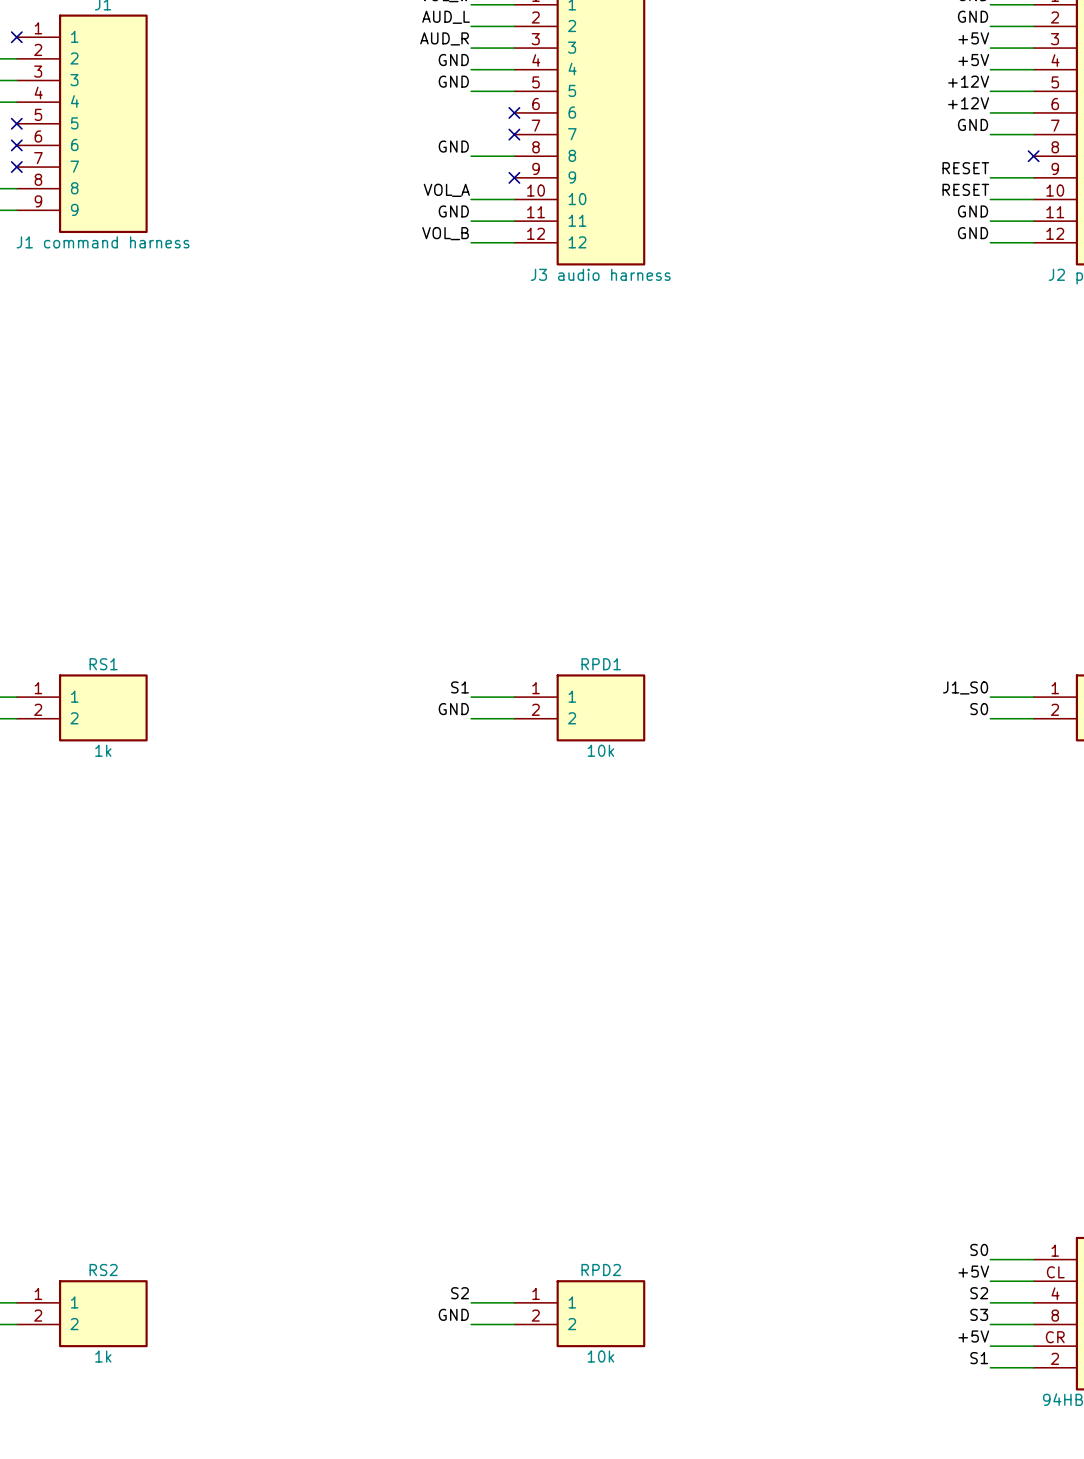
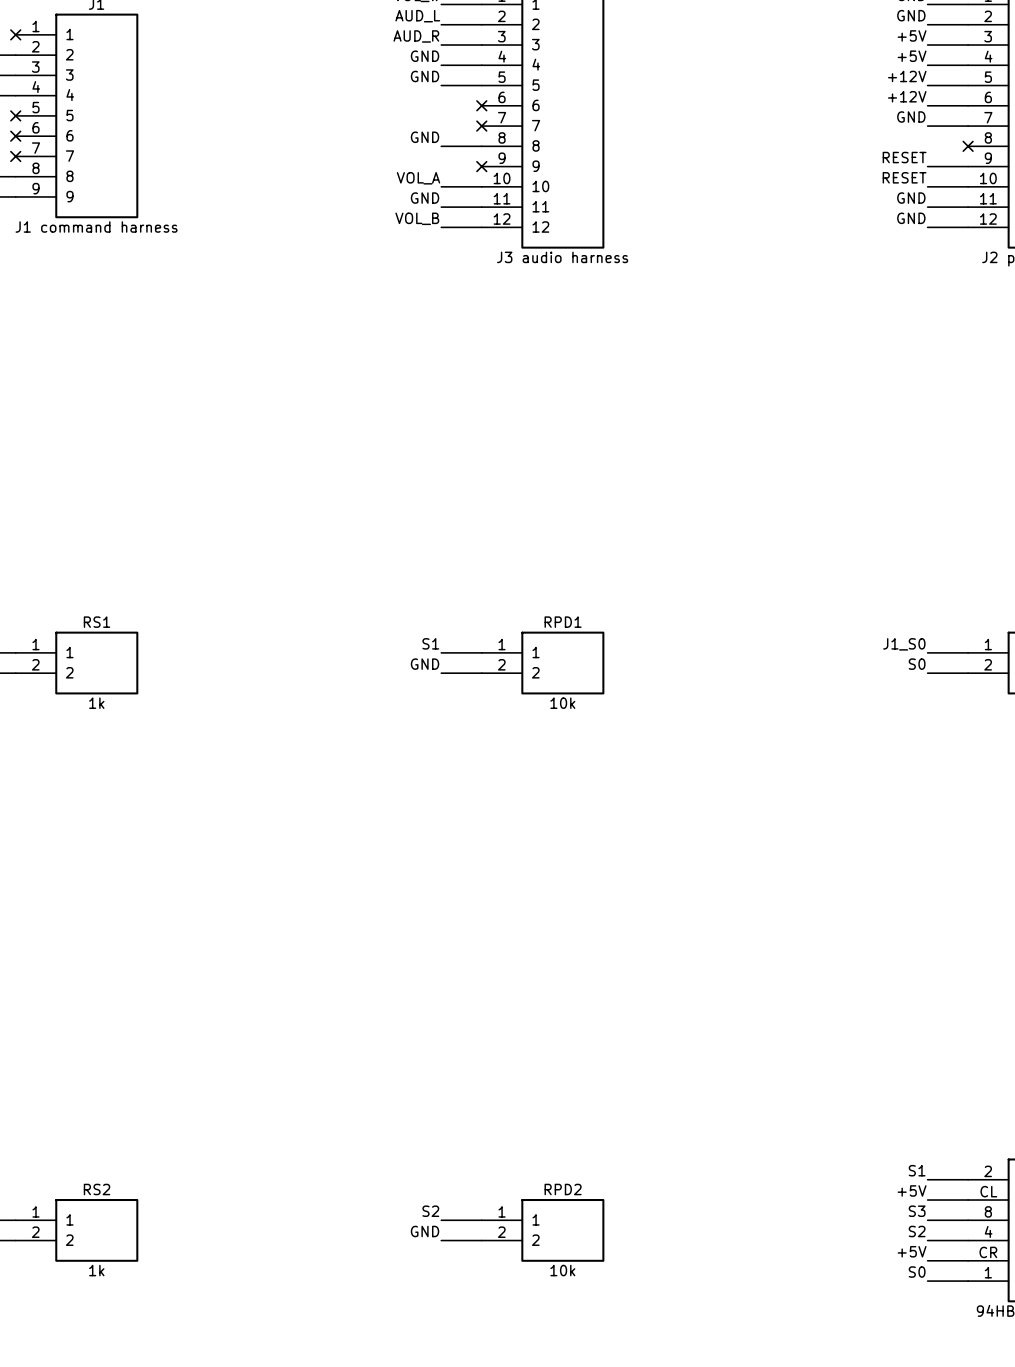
label: S0 (979, 1249) -> S1 (917, 1170)
part pin number: 1 (1055, 1250) -> 2 (988, 1171)
label: S2 (979, 1293) -> S3 (917, 1211)
part pin number: 4 (1055, 1293) -> 8 (988, 1211)
label: S3 (979, 1314) -> S2 (917, 1231)
part pin number: 8 (1055, 1315) -> 4 (988, 1231)
label: S1 (979, 1358) -> S0 (917, 1272)
part pin number: 2 (1055, 1358) -> 1 (988, 1272)

